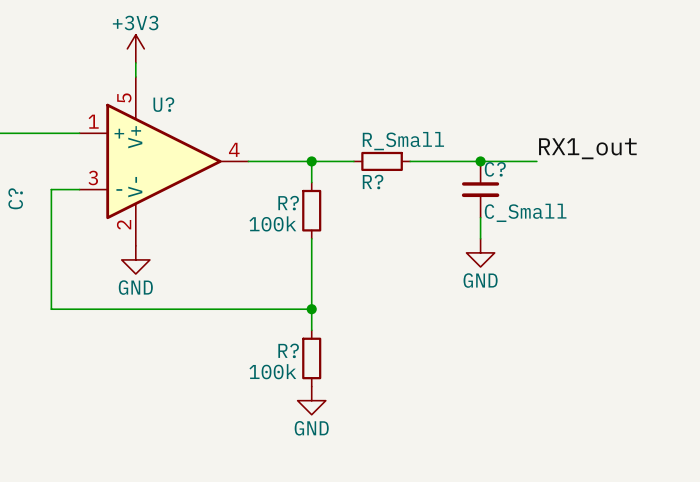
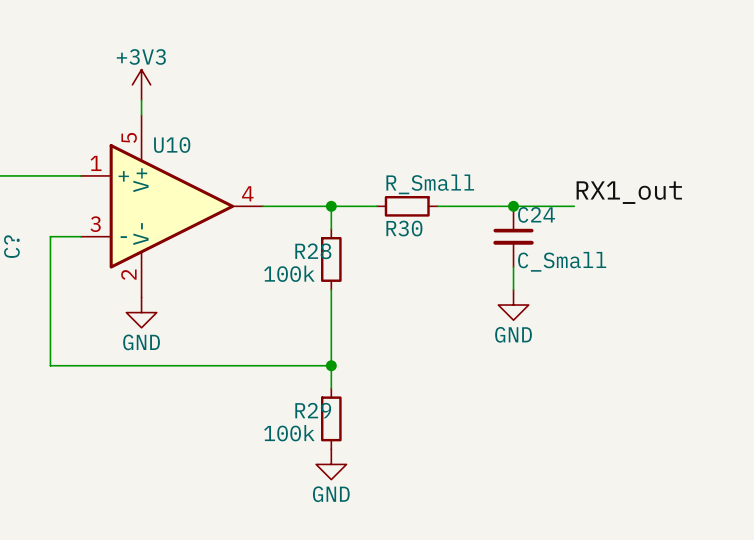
U? name: U? (163, 104) -> U10 (172, 145)
C? name: C? (495, 169) -> C24 (536, 214)
R? name: R? (373, 181) -> R30 (404, 228)
R? name: R? (288, 203) -> R28 (313, 251)
R? name: R? (288, 350) -> R29 (313, 410)

